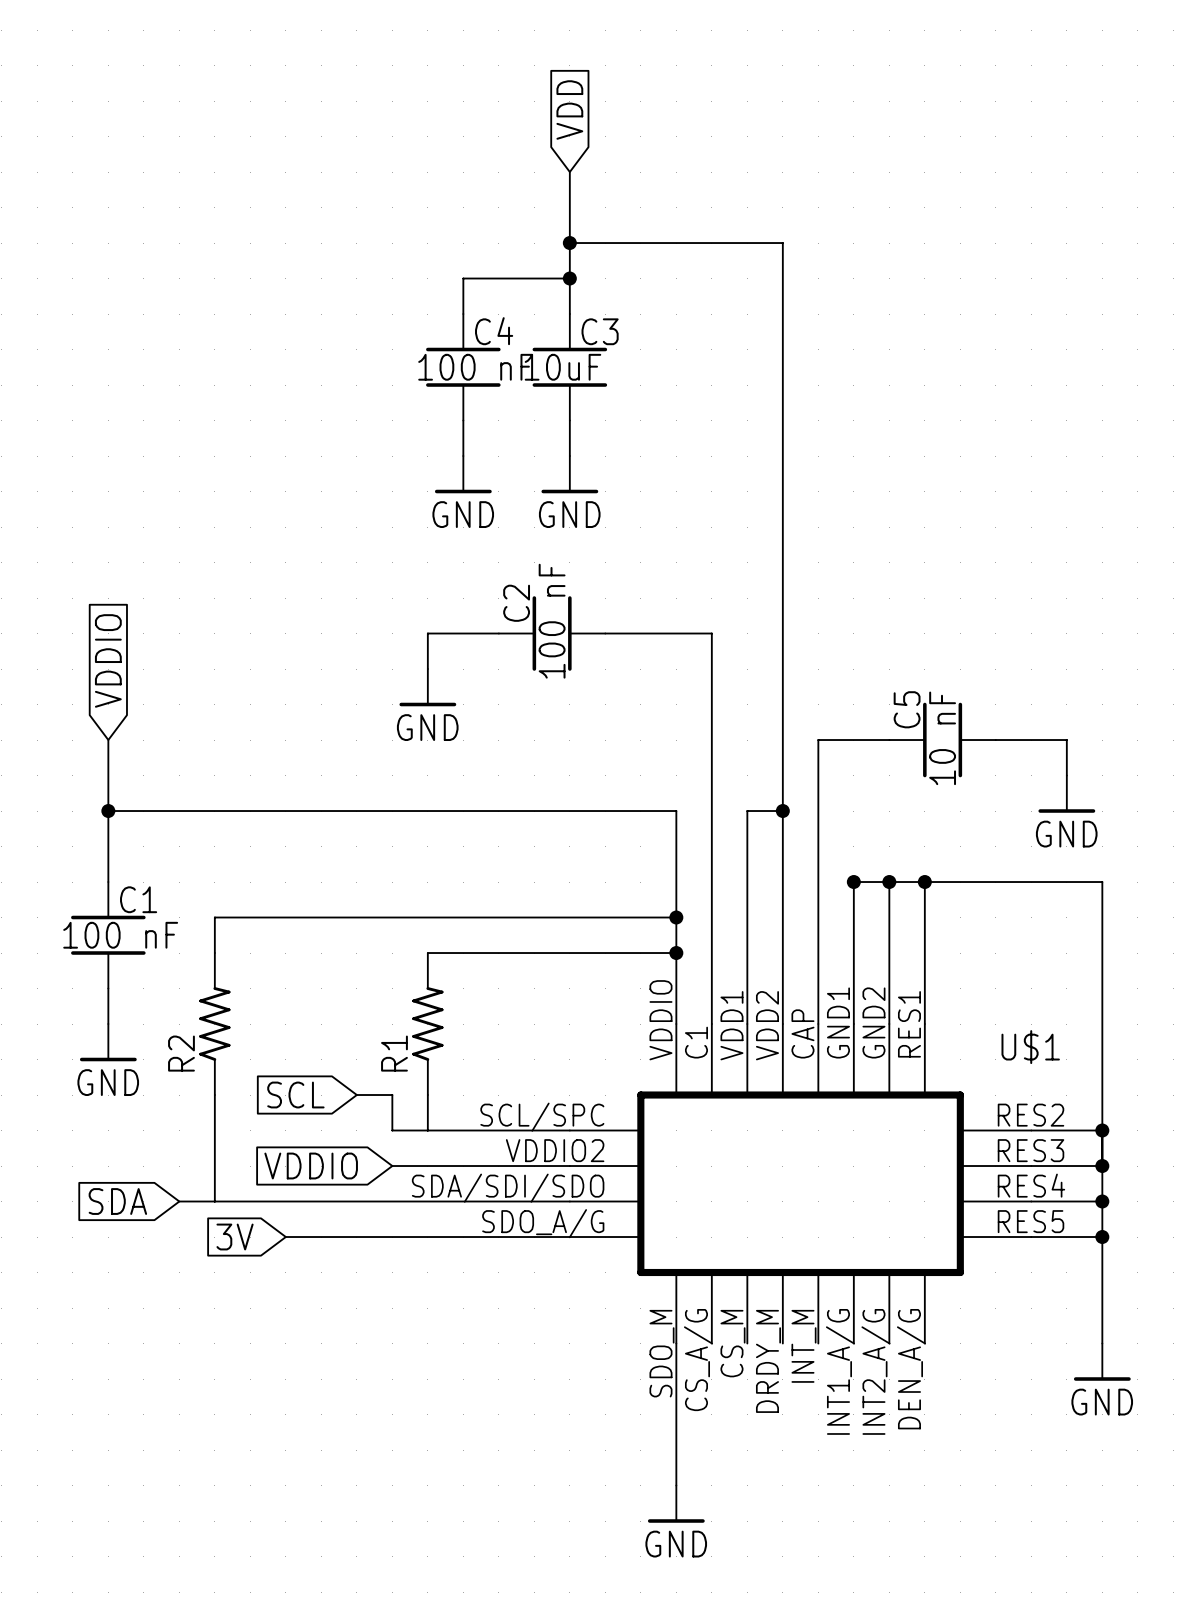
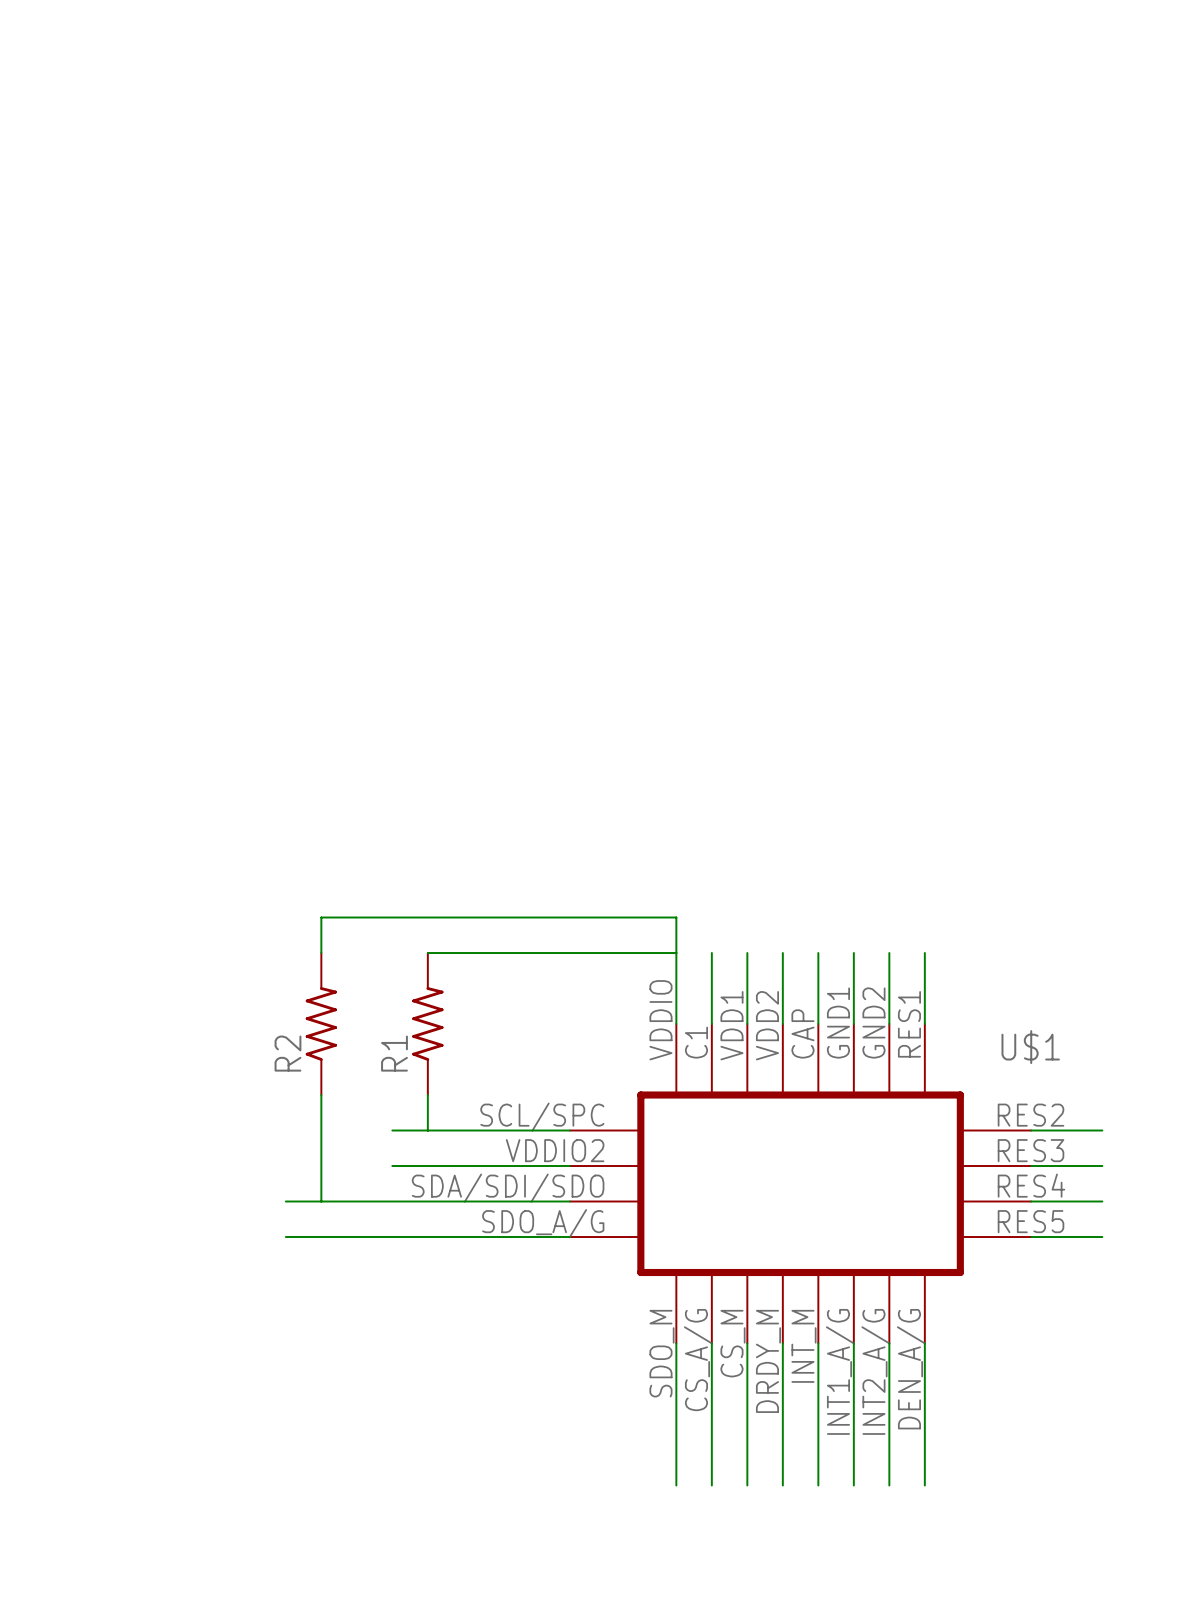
global label: VDD (569, 110) -> none
wire: (569, 172) (569, 314) -> none
wire: (569, 243) (782, 243) (782, 953) -> none
junction: (569, 243) -> none
wire: (569, 278) (463, 278) (463, 314) -> none
junction: (569, 278) -> none
C4: 100 nF (463, 367) -> none
C3: 10uF (569, 367) -> none
wire: (463, 420) (463, 456) -> none
wire: (569, 420) (569, 456) -> none
power symbol: GND (463, 474) -> none
power symbol: GND (569, 474) -> none
wire: (498, 633) (427, 633) (427, 669) -> none
C2: 100 nF (552, 633) -> none
wire: (605, 633) (711, 633) (711, 953) -> none
global label: VDDIO (108, 660) -> none
power symbol: GND (427, 687) -> none
wire: (108, 740) (108, 882) -> none
wire: (889, 740) (818, 740) (818, 953) -> none
C5: 10 nF (942, 740) -> none
wire: (995, 740) (1066, 740) (1066, 775) -> none
power symbol: GND (1066, 794) -> none
wire: (108, 811) (676, 811) (676, 917) -> none
junction: (108, 811) -> none
wire: (782, 811) (747, 811) (747, 953) -> none
junction: (782, 811) -> none
junction: (853, 882) -> none
wire: (889, 882) (889, 953) -> none
junction: (889, 882) -> none
wire: (924, 882) (924, 953) -> none
junction: (924, 882) -> none
wire: (321, 917) (214, 917) (214, 953) -> (321, 917) (321, 953)
junction: (676, 917) -> none
C1: 100 nF (108, 935) -> none
junction: (676, 953) -> none
wire: (853, 953) (853, 882) (1102, 882) (1102, 1343) -> none
wire: (108, 988) (108, 1024) -> none
R2 position: (214, 1024) -> (321, 1024)
power symbol: GND (108, 1042) -> none
wire: (214, 1095) (214, 1201) -> (321, 1095) (321, 1201)
global label: SCL (295, 1095) -> none
wire: (356, 1095) (392, 1095) (392, 1130) -> none
junction: (1102, 1130) -> none
global label: VDDIO (311, 1166) -> none
junction: (1102, 1166) -> none
global label: SDA (117, 1201) -> none
wire: (179, 1201) (285, 1201) -> none
junction: (1102, 1201) -> none
global label: 3V (235, 1237) -> none
junction: (1102, 1237) -> none
wire: none -> (711, 1343) (711, 1485)
wire: none -> (747, 1343) (747, 1485)
wire: none -> (782, 1343) (782, 1485)
wire: none -> (818, 1343) (818, 1485)
wire: none -> (853, 1343) (853, 1485)
wire: none -> (889, 1343) (889, 1485)
wire: none -> (924, 1343) (924, 1485)
power symbol: GND (1102, 1362) -> none
power symbol: GND (676, 1504) -> none

